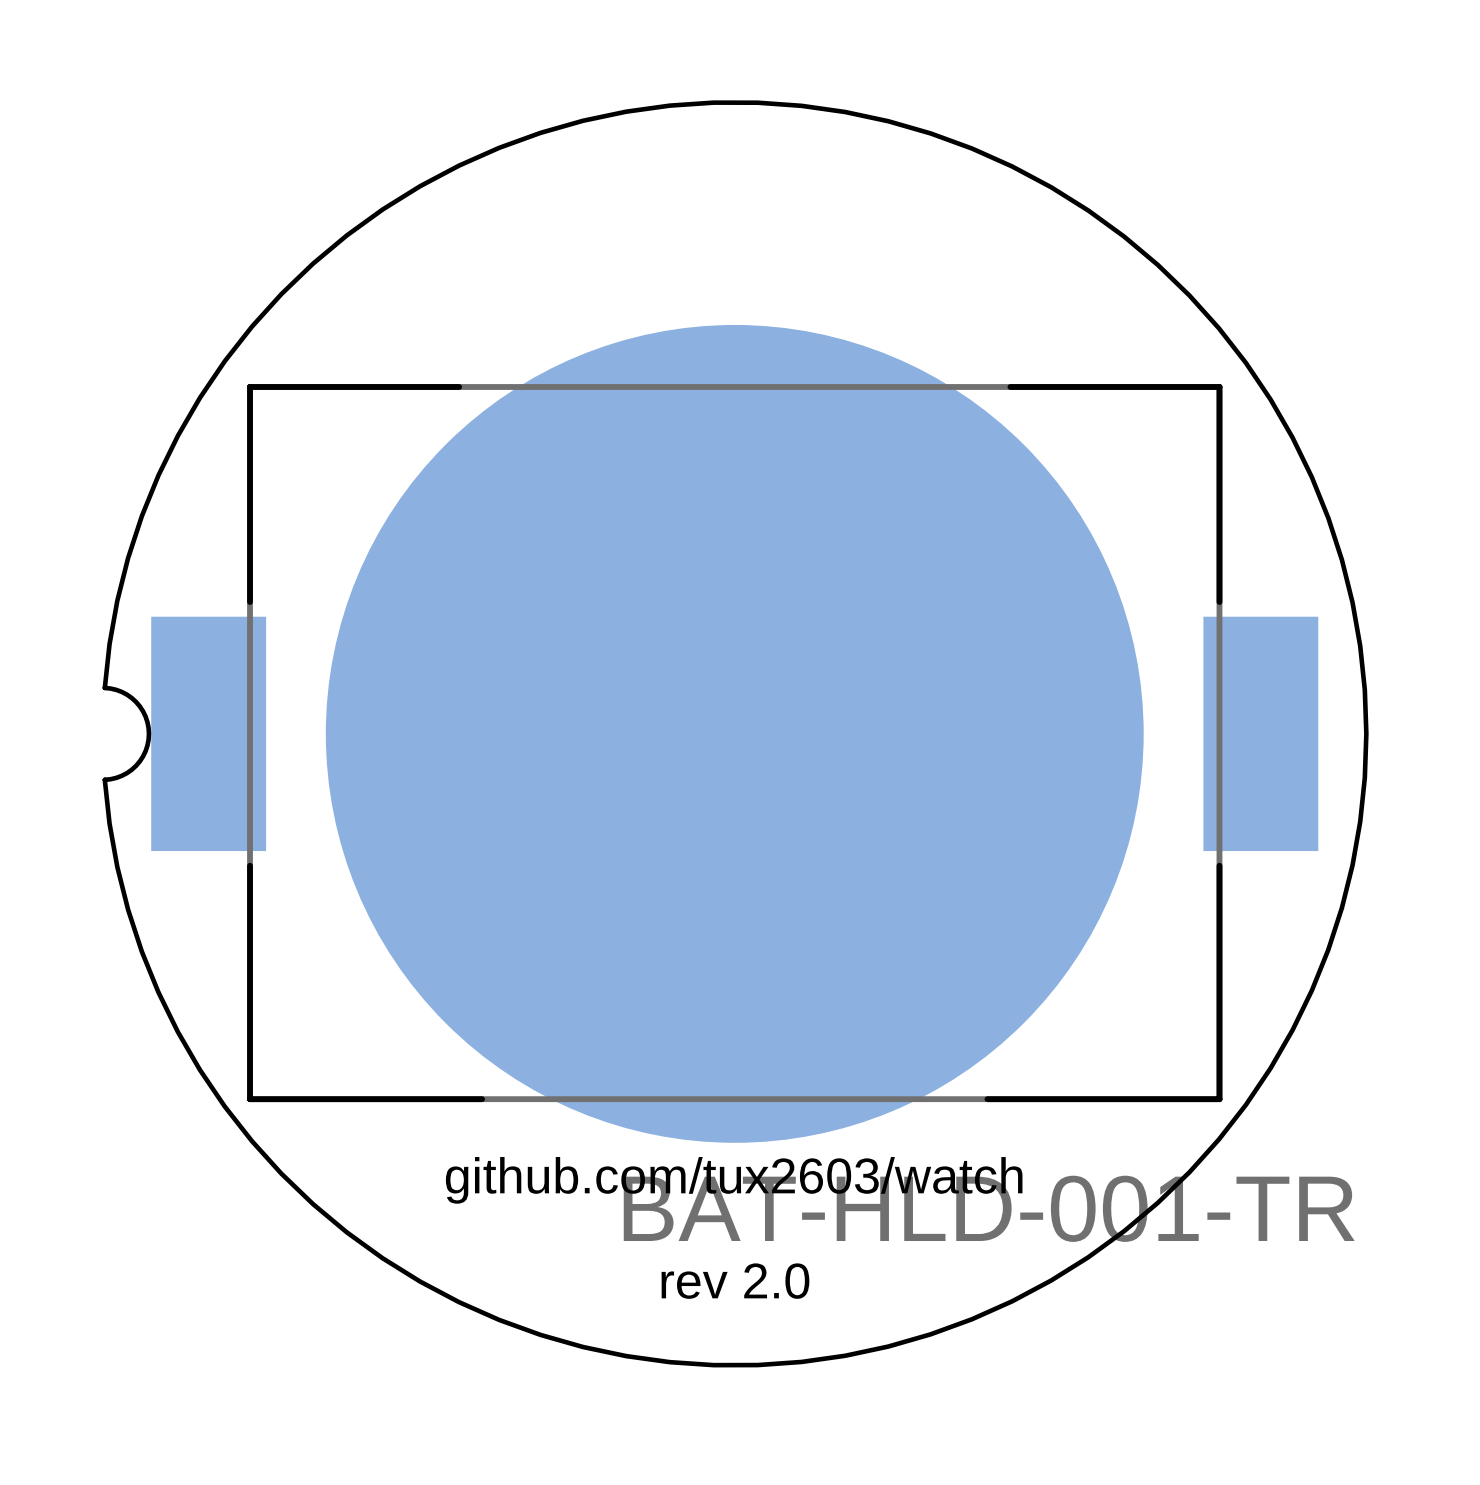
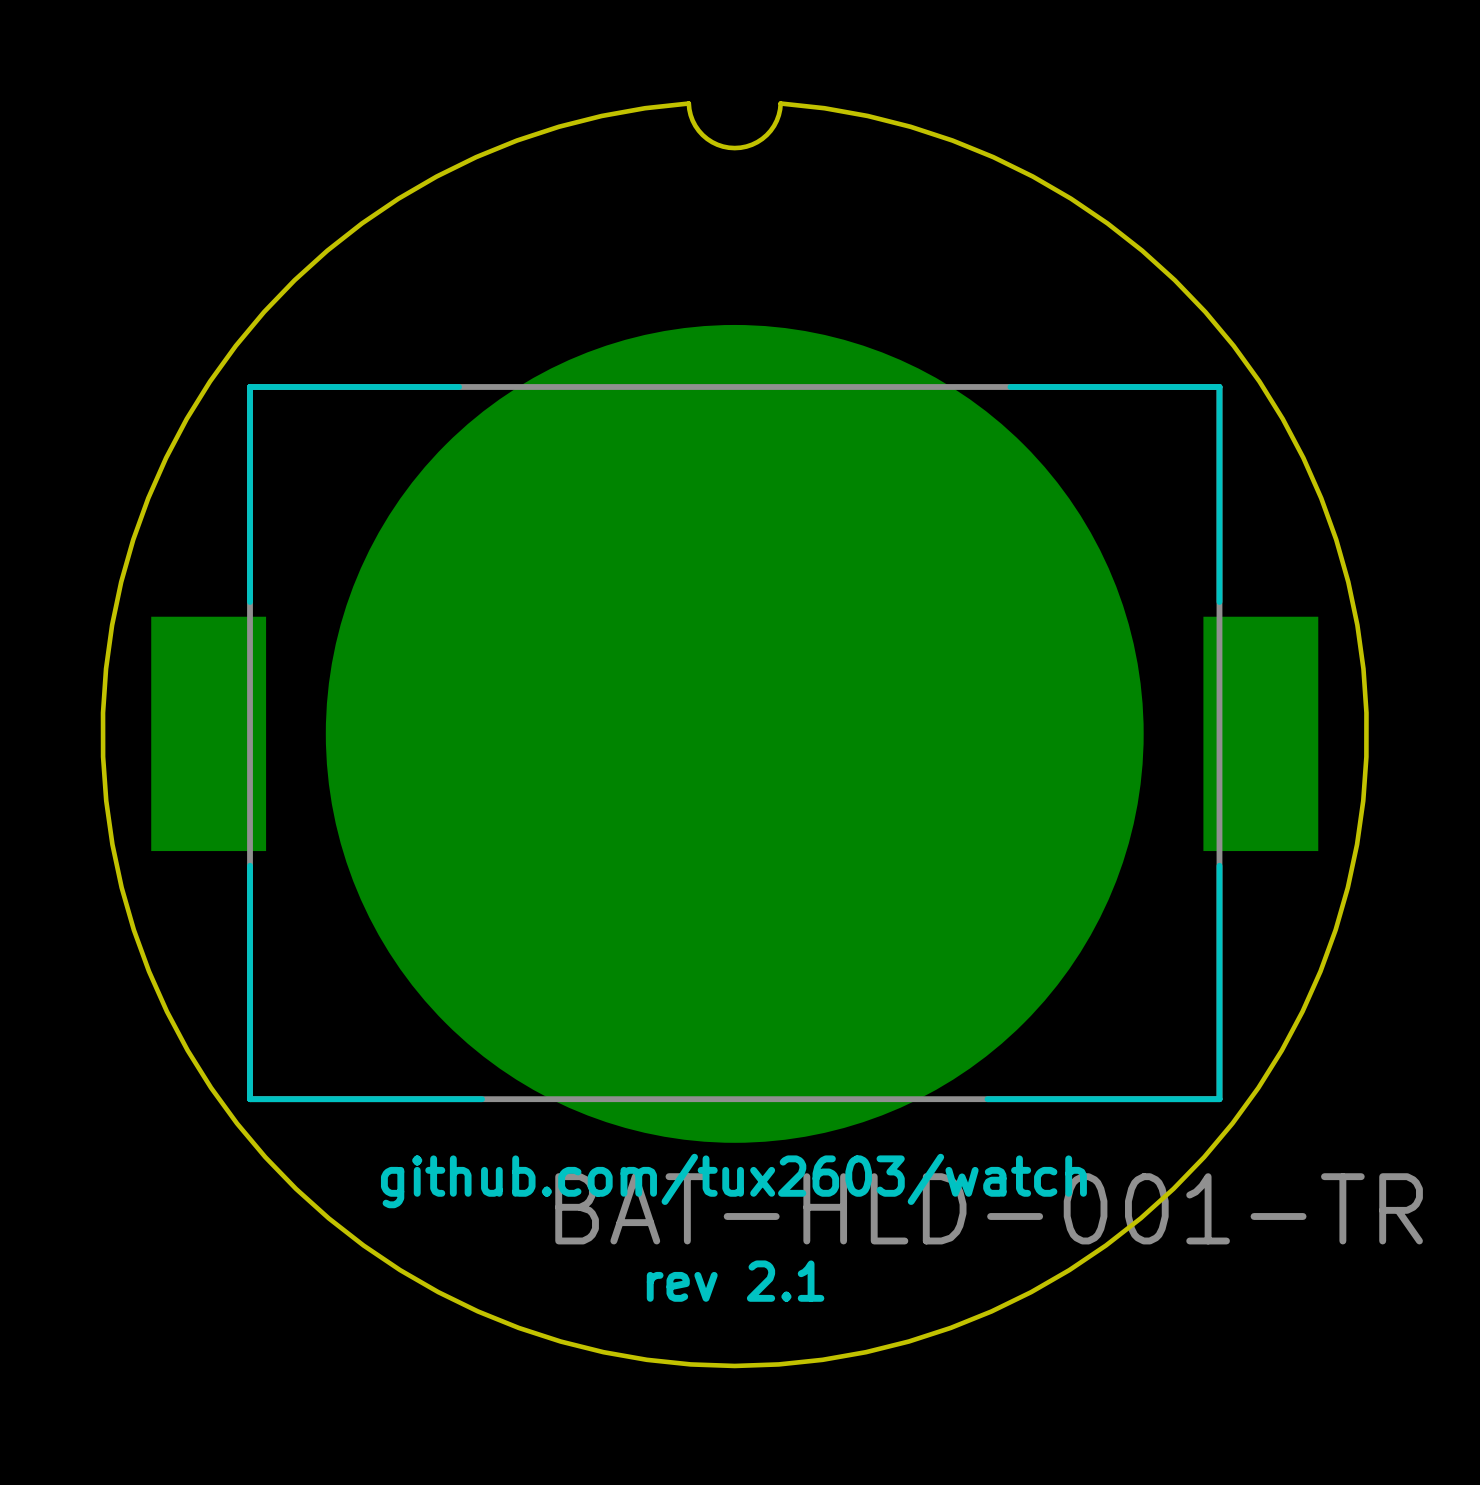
board edge: (104, 687) (109, 644) (117, 600) (128, 558) (141, 516) (158, 475) (177, 435) (199, 397) (224, 361) (251, 326) (281, 294) (313, 263) (346, 235) (382, 209) (420, 186) (458, 165) (499, 147) (540, 132) (583, 120) (626, 111) (669, 105) (713, 102) (757, 102) (801, 105) (845, 112) (888, 121) (930, 133) (972, 148) (1012, 166) (1051, 187) (1088, 210) (1124, 236) (1157, 264) (1189, 295) (1218, 328) (1245, 362) (1270, 399) (1292, 437) (1311, 477) (1328, 518) (1341, 559) (1352, 602) (1360, 646) (1364, 689) (1366, 733) (1364, 777) (1360, 821) (1352, 865) (1341, 907) (1328, 949) (1311, 990) (1292, 1030) (1270, 1068) (1245, 1104) (1218, 1139) (1189, 1172) (1157, 1202) (1124, 1231) (1088, 1257) (1051, 1280) (1012, 1301) (972, 1319) (930, 1334) (888, 1346) (845, 1355) (801, 1361) (757, 1365) (713, 1365) (669, 1362) (626, 1356) (583, 1347) (540, 1334) (499, 1319) (458, 1302) (420, 1281) (382, 1258) (346, 1232) (313, 1204) (281, 1173) (251, 1141) (224, 1106) (199, 1069) (177, 1031) (158, 992) (141, 951) (128, 909) (117, 866) (109, 823) (104, 779) (127, 773) (139, 761) (147, 745) (148, 728) (143, 711) (131, 698) (116, 689) (104, 687) -> (780, 103) (776, 120) (766, 135) (752, 144) (740, 147) (723, 146) (707, 138) (695, 125) (690, 115) (688, 103) (644, 108) (601, 116) (558, 126) (516, 140) (476, 157) (436, 176) (398, 198) (362, 223) (327, 250) (294, 280) (264, 311) (235, 345) (210, 381) (186, 418) (166, 457) (148, 498) (133, 539) (121, 582) (112, 625) (106, 668) (103, 712) (103, 756) (106, 800) (112, 844) (121, 887) (133, 929) (148, 971) (166, 1011) (187, 1050) (211, 1087) (237, 1123) (265, 1157) (296, 1188) (328, 1218) (363, 1245) (400, 1270) (438, 1292) (477, 1311) (518, 1327) (560, 1341) (603, 1352) (646, 1359) (690, 1364) (734, 1365) (778, 1364) (822, 1359) (866, 1352) (908, 1341) (950, 1327) (991, 1311) (1031, 1292) (1069, 1270) (1105, 1245) (1140, 1218) (1173, 1188) (1204, 1157) (1232, 1123) (1258, 1087) (1281, 1050) (1302, 1011) (1320, 971) (1335, 929) (1347, 887) (1357, 844) (1363, 800) (1366, 756) (1366, 712) (1363, 668) (1357, 625) (1348, 582) (1336, 539) (1321, 498) (1303, 457) (1282, 418) (1259, 381) (1233, 345) (1205, 311) (1174, 280) (1142, 250) (1107, 223) (1071, 198) (1032, 176) (993, 157) (952, 140) (910, 126) (867, 116) (824, 108) (780, 103)
text: rev 2.0 (735, 1281) -> rev 2.1 (735, 1281)

